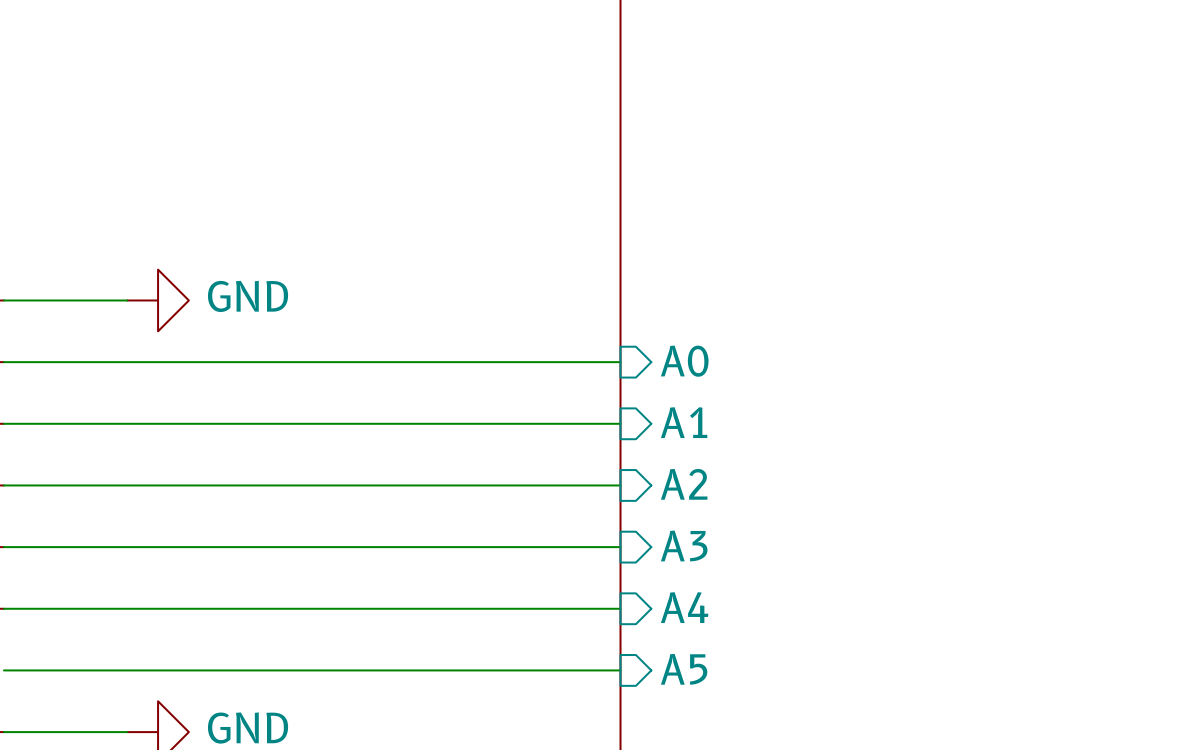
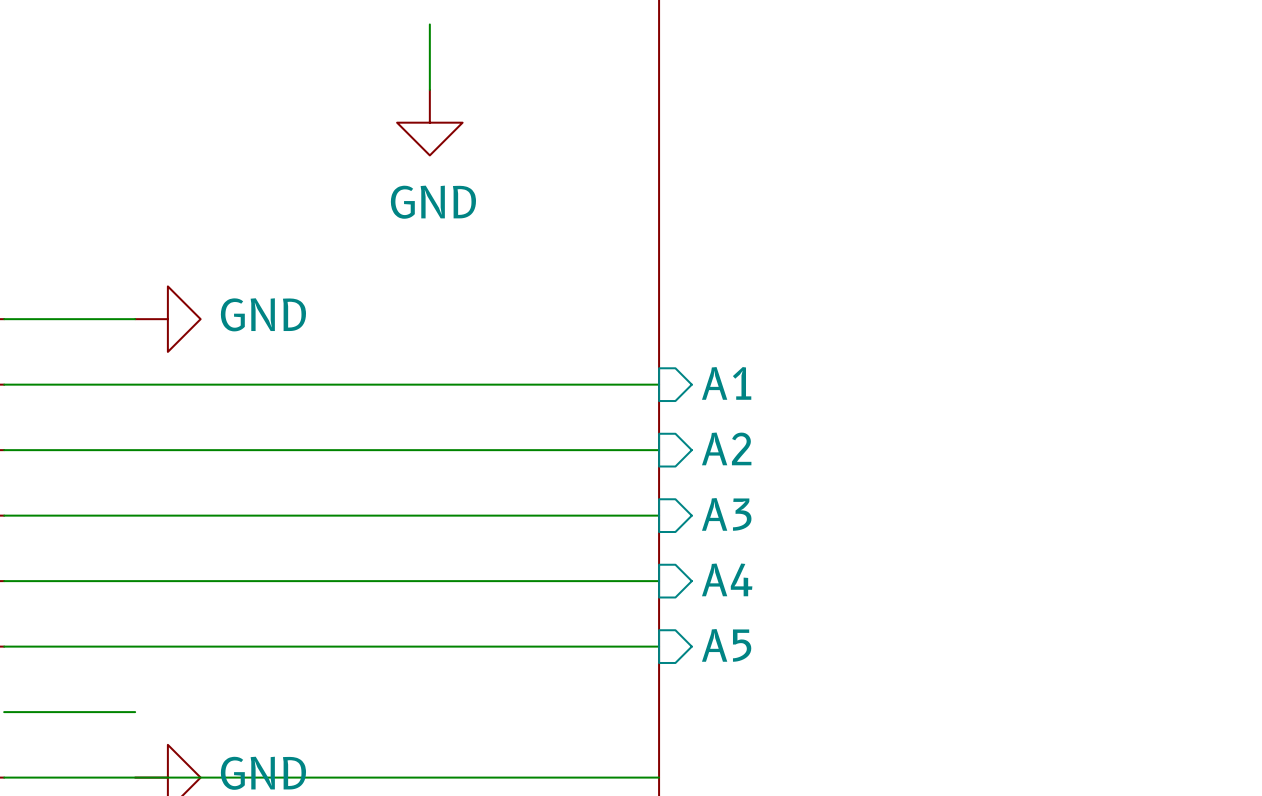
wire: none -> (429, 24) (429, 89)
power symbol: none -> GND (429, 122)
sheet pin: A0 (684, 361) -> A1 (726, 383)
sheet pin: A1 (684, 422) -> A2 (726, 448)
sheet pin: A2 (684, 484) -> A3 (726, 514)
sheet pin: A3 (684, 545) -> A4 (727, 579)
sheet pin: A4 (684, 607) -> A5 (726, 645)
sheet pin: A5 (684, 669) -> none
wire: (127, 670) (620, 670) -> (135, 777) (659, 777)

